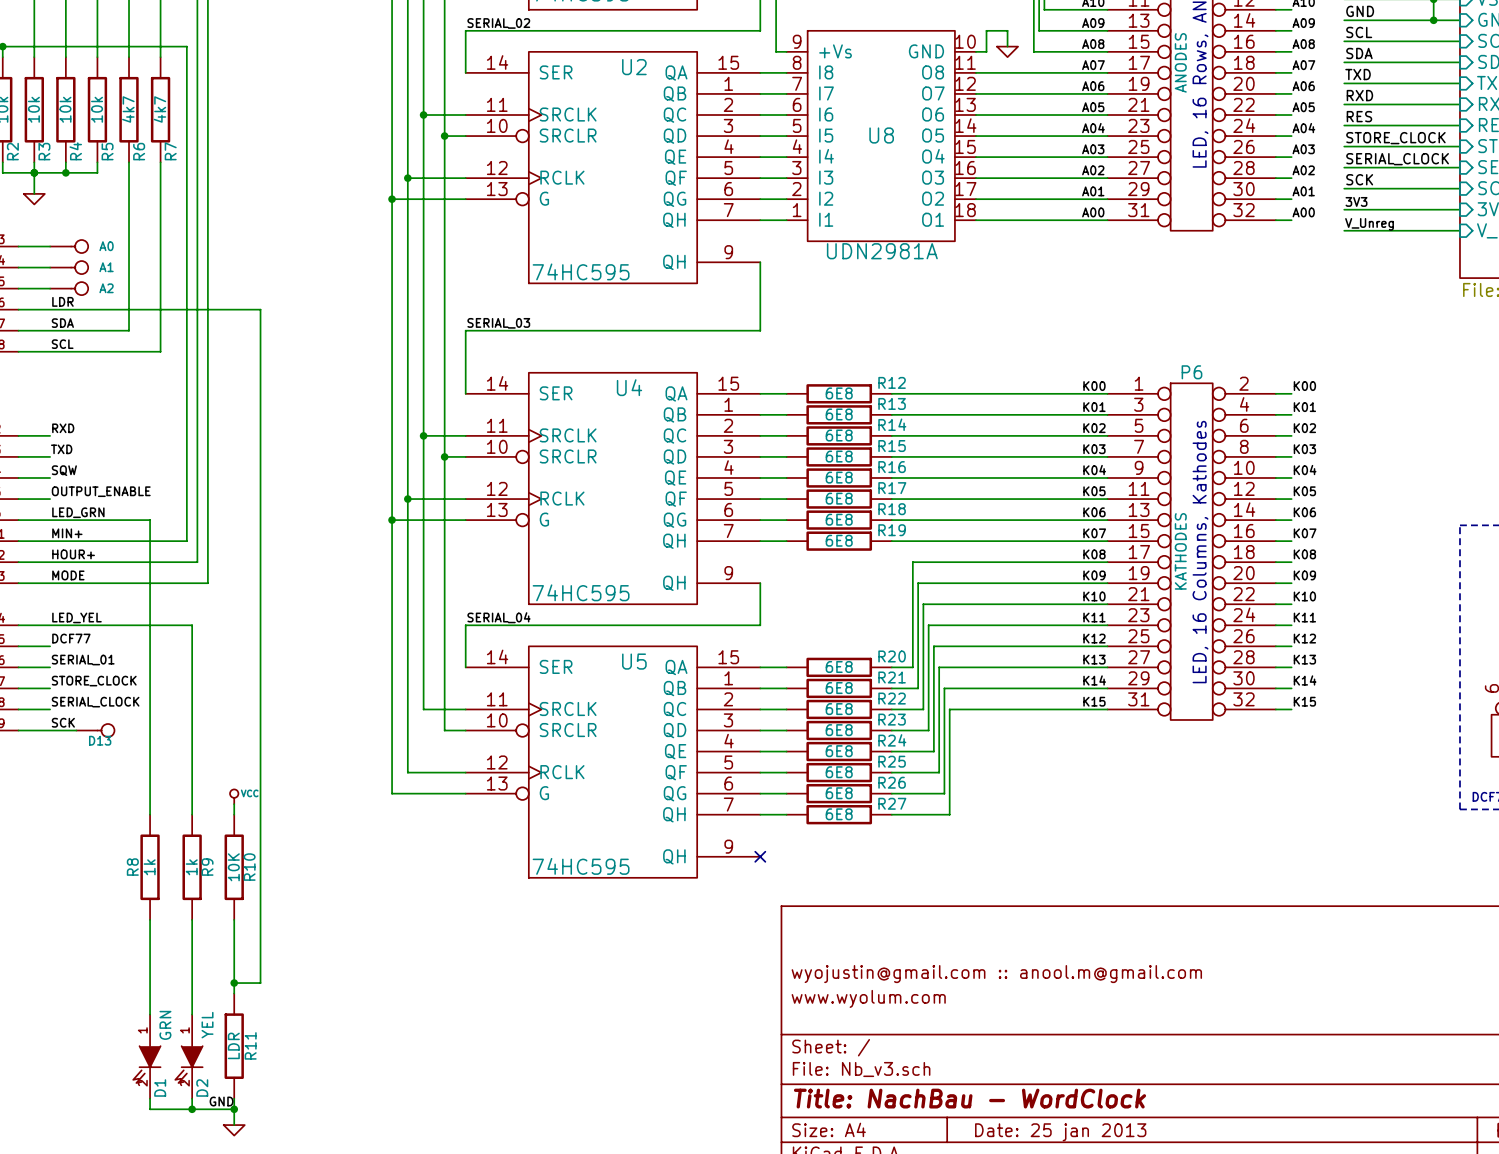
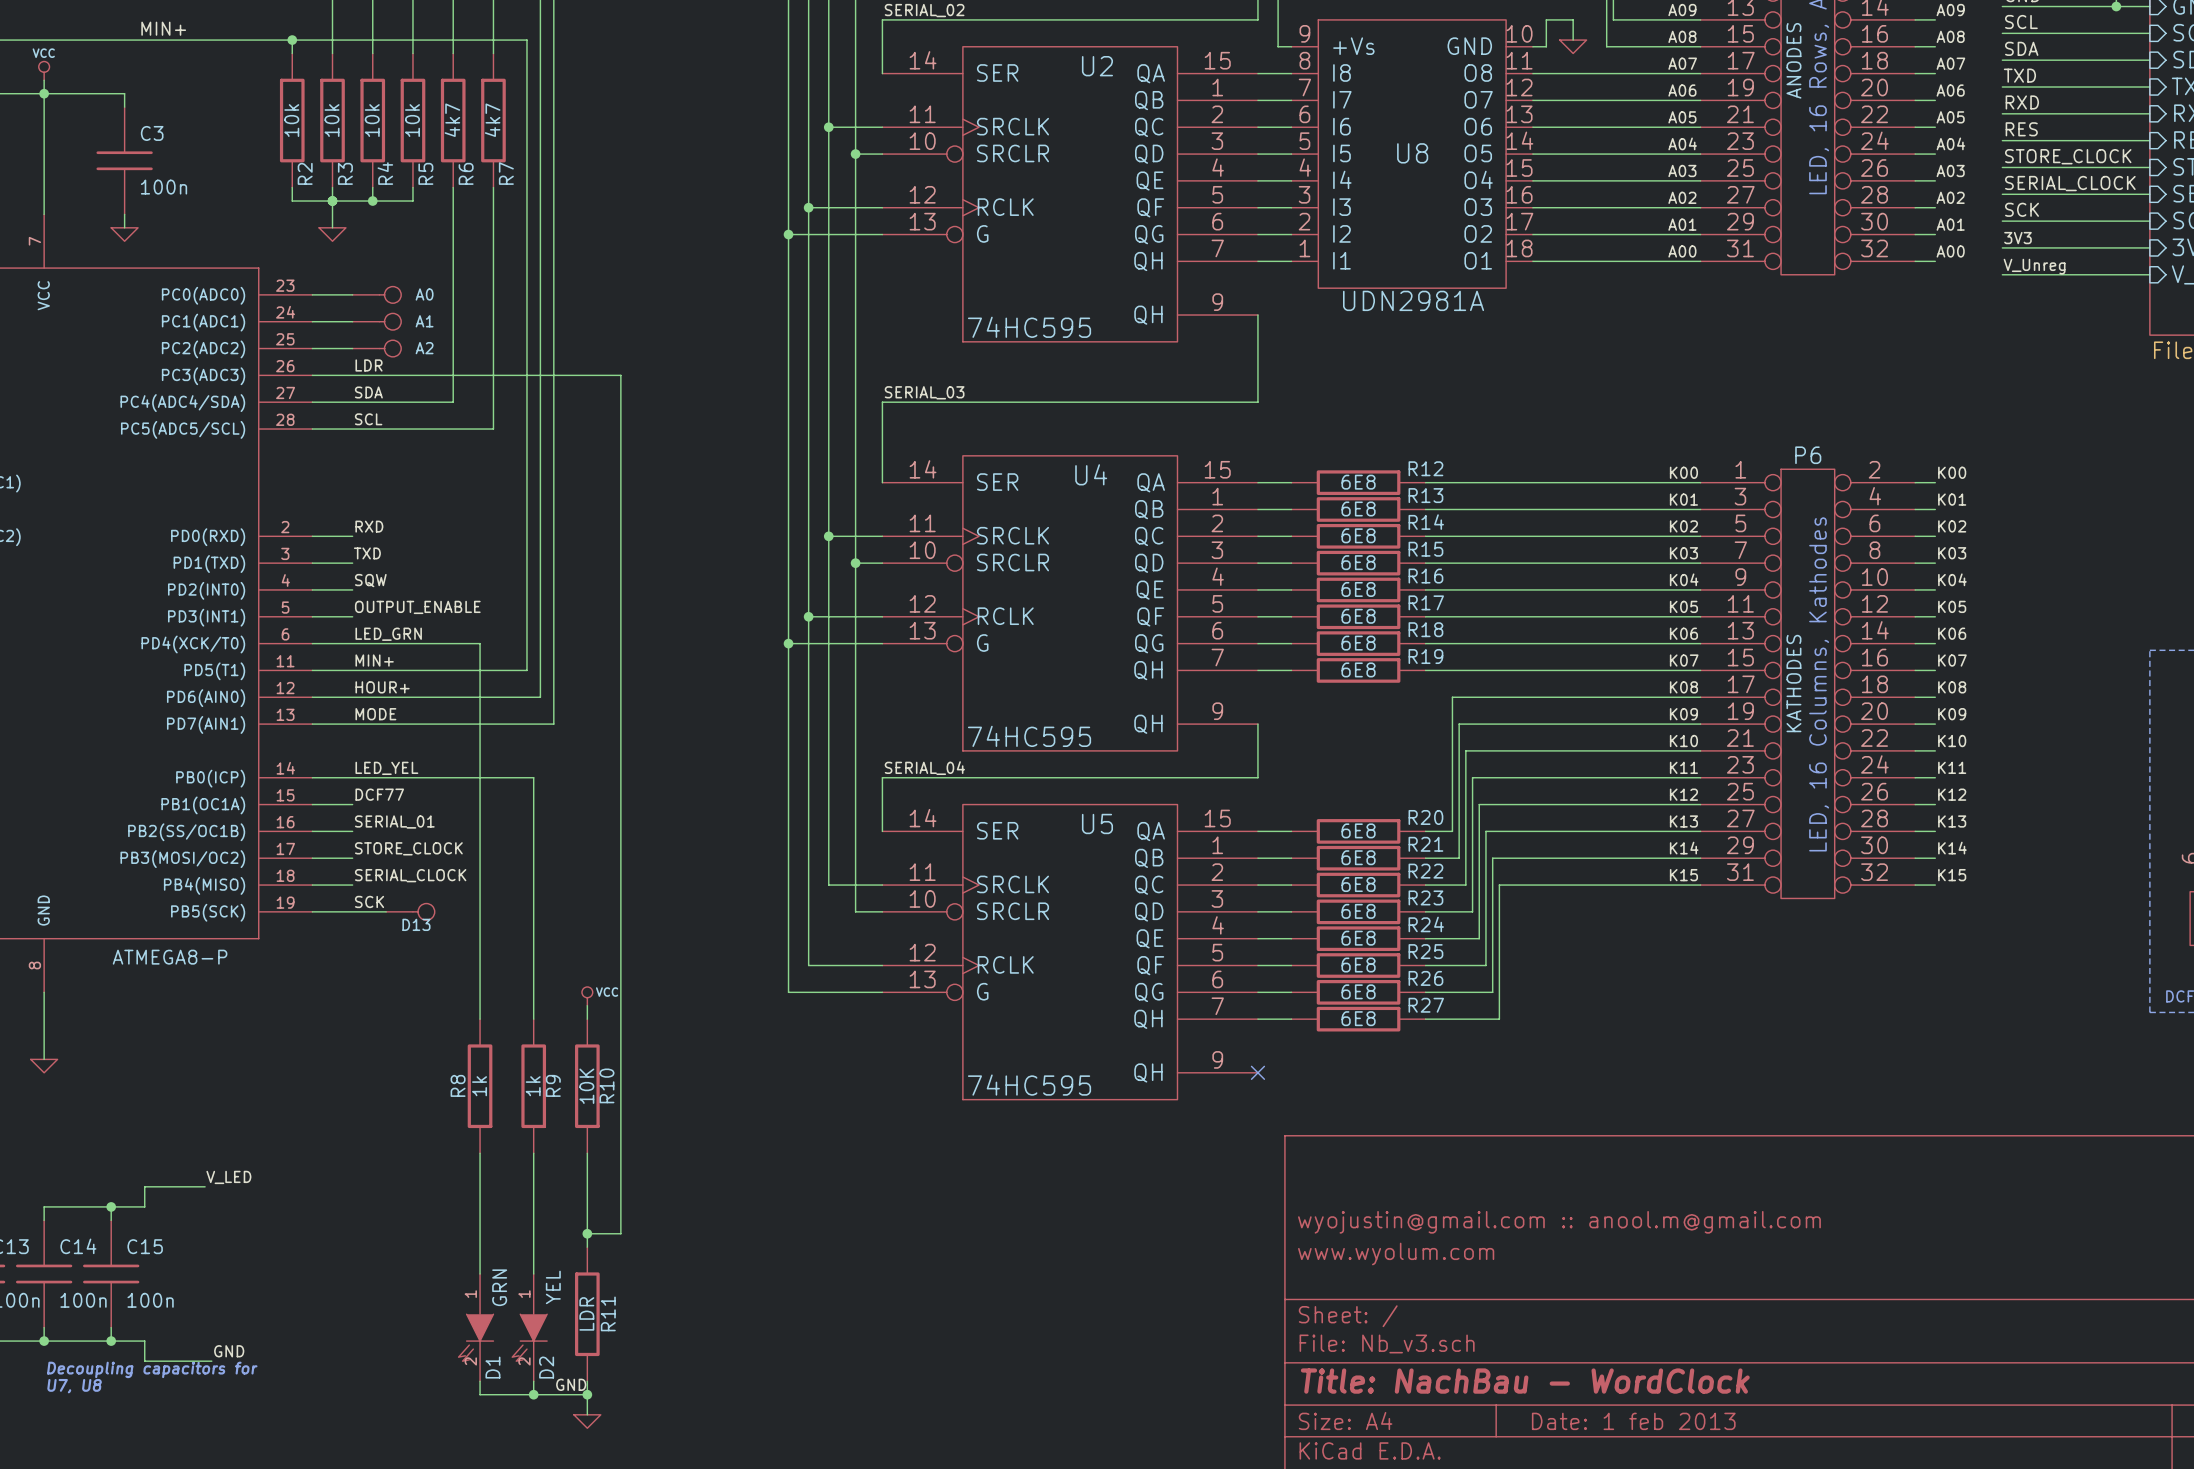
title block: Date: 25 jan 2013 (1060, 1132) -> Date: 1 feb 2013 (1633, 1421)

